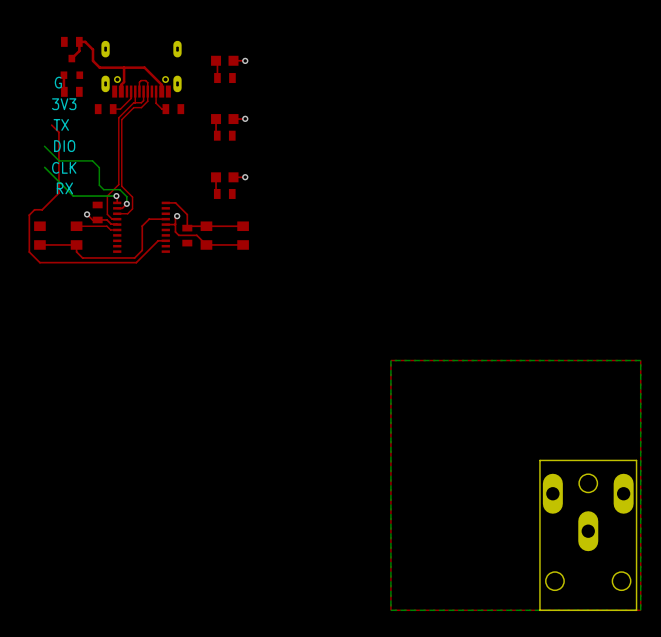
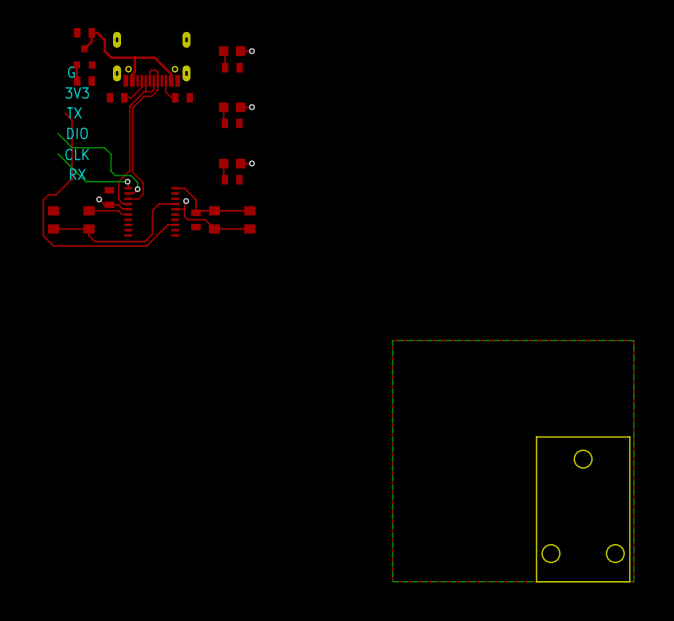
part: (552, 493) -> none
part: (623, 493) -> none
part: (588, 531) -> none

